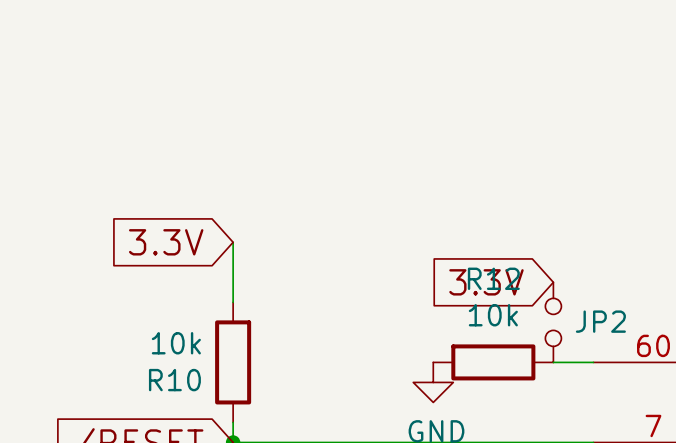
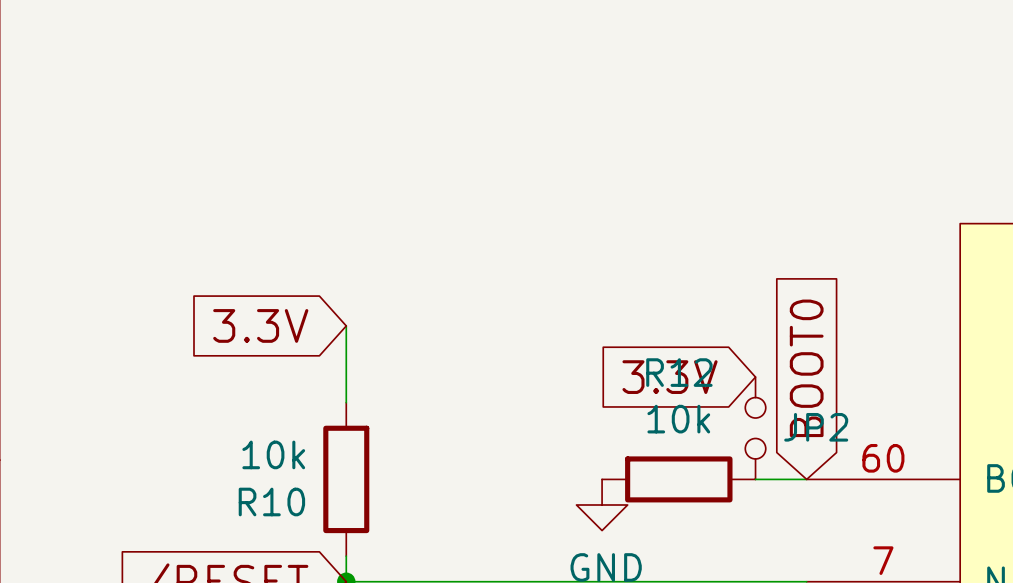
global label: none -> BOOT0 (806, 368)

